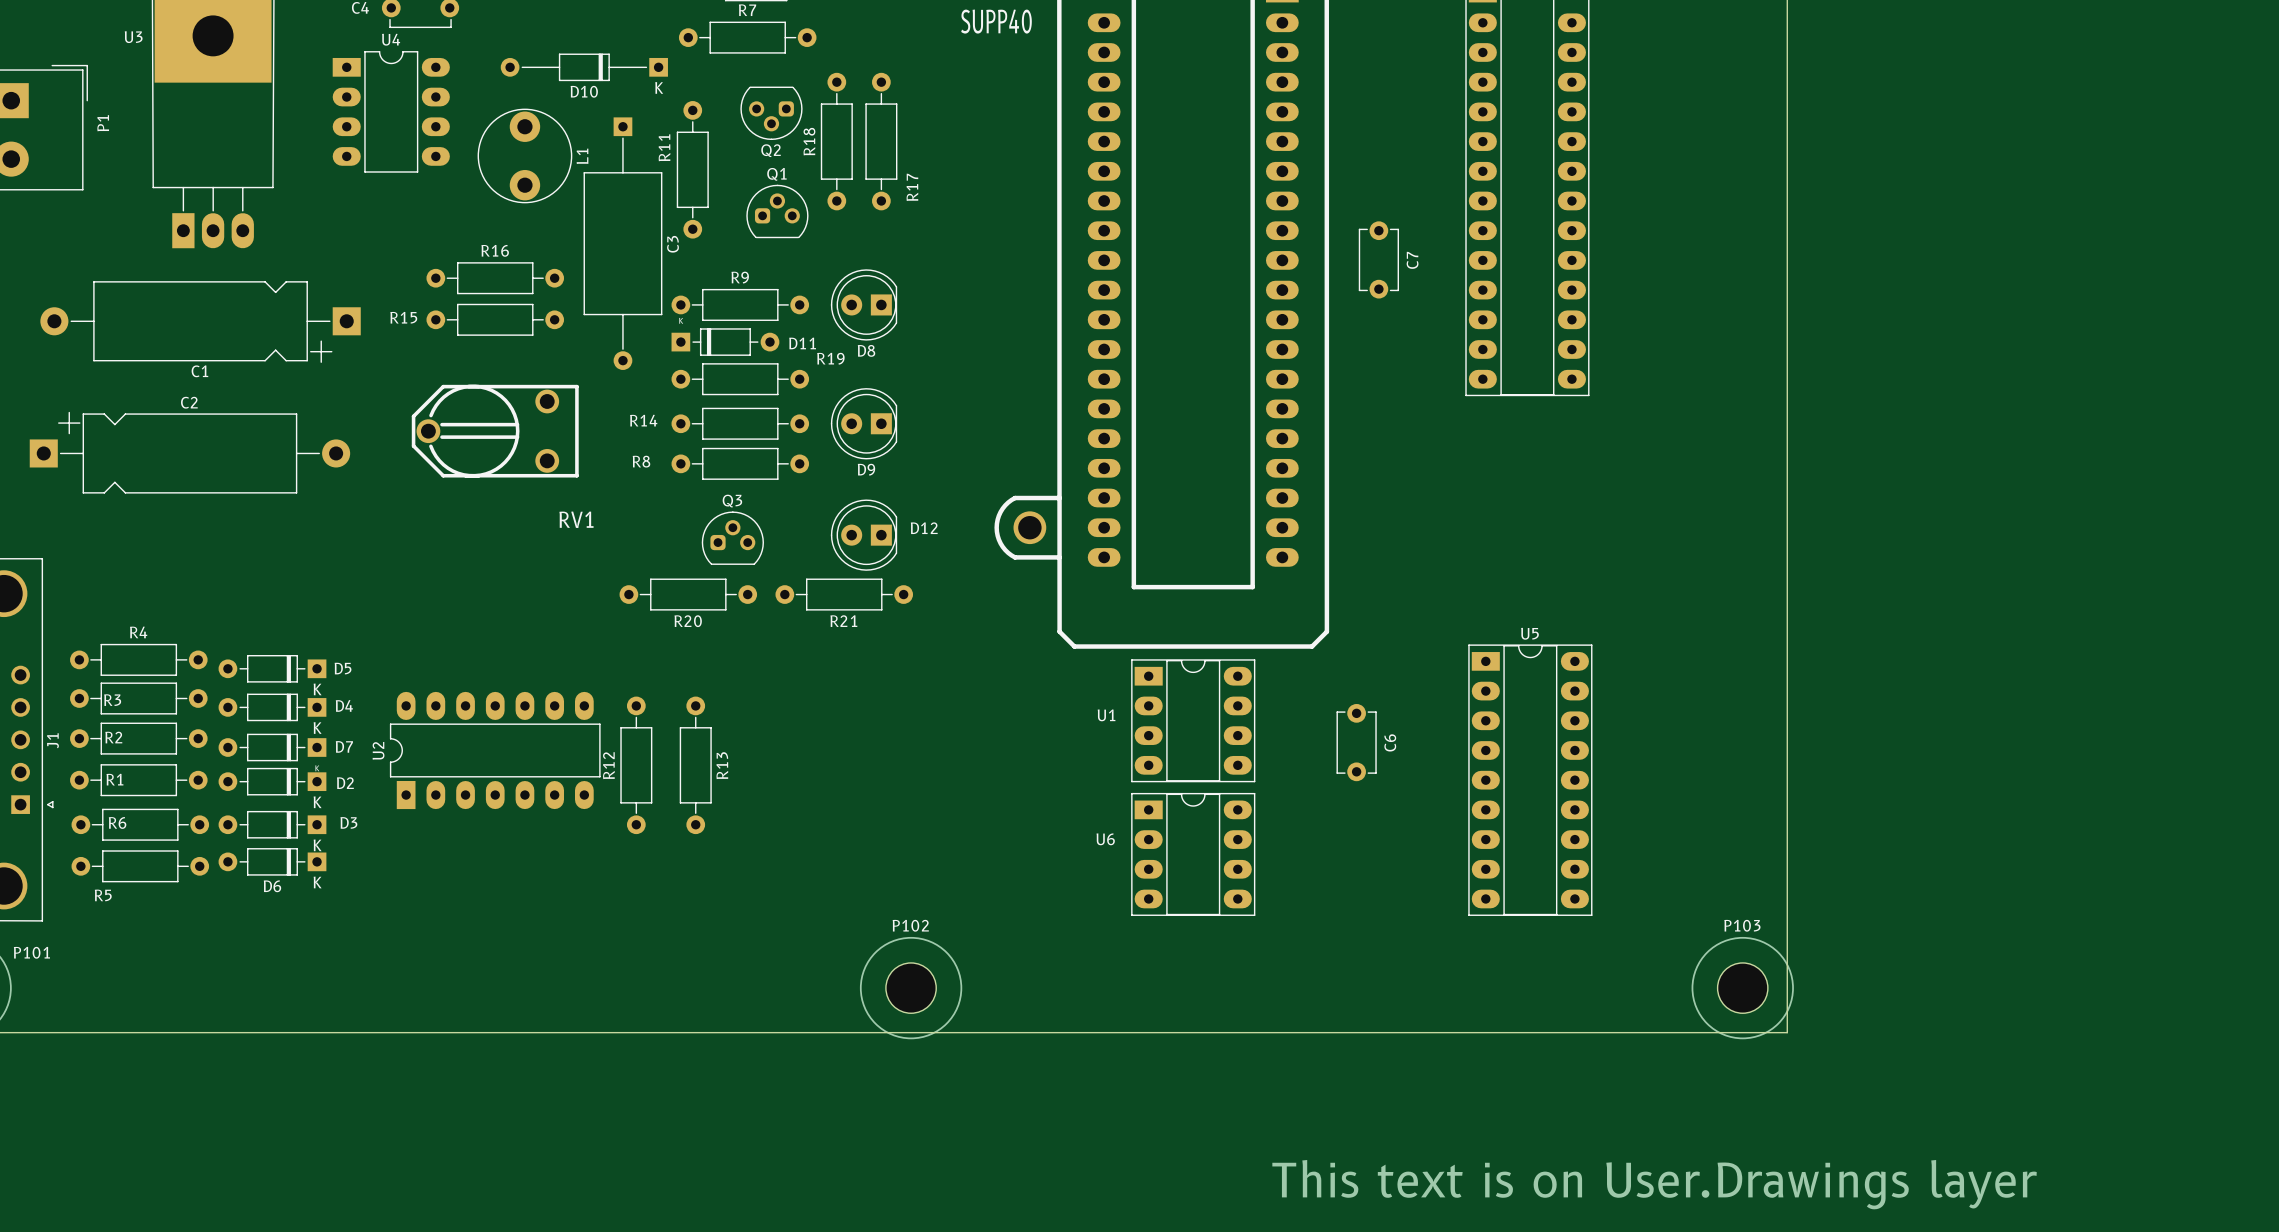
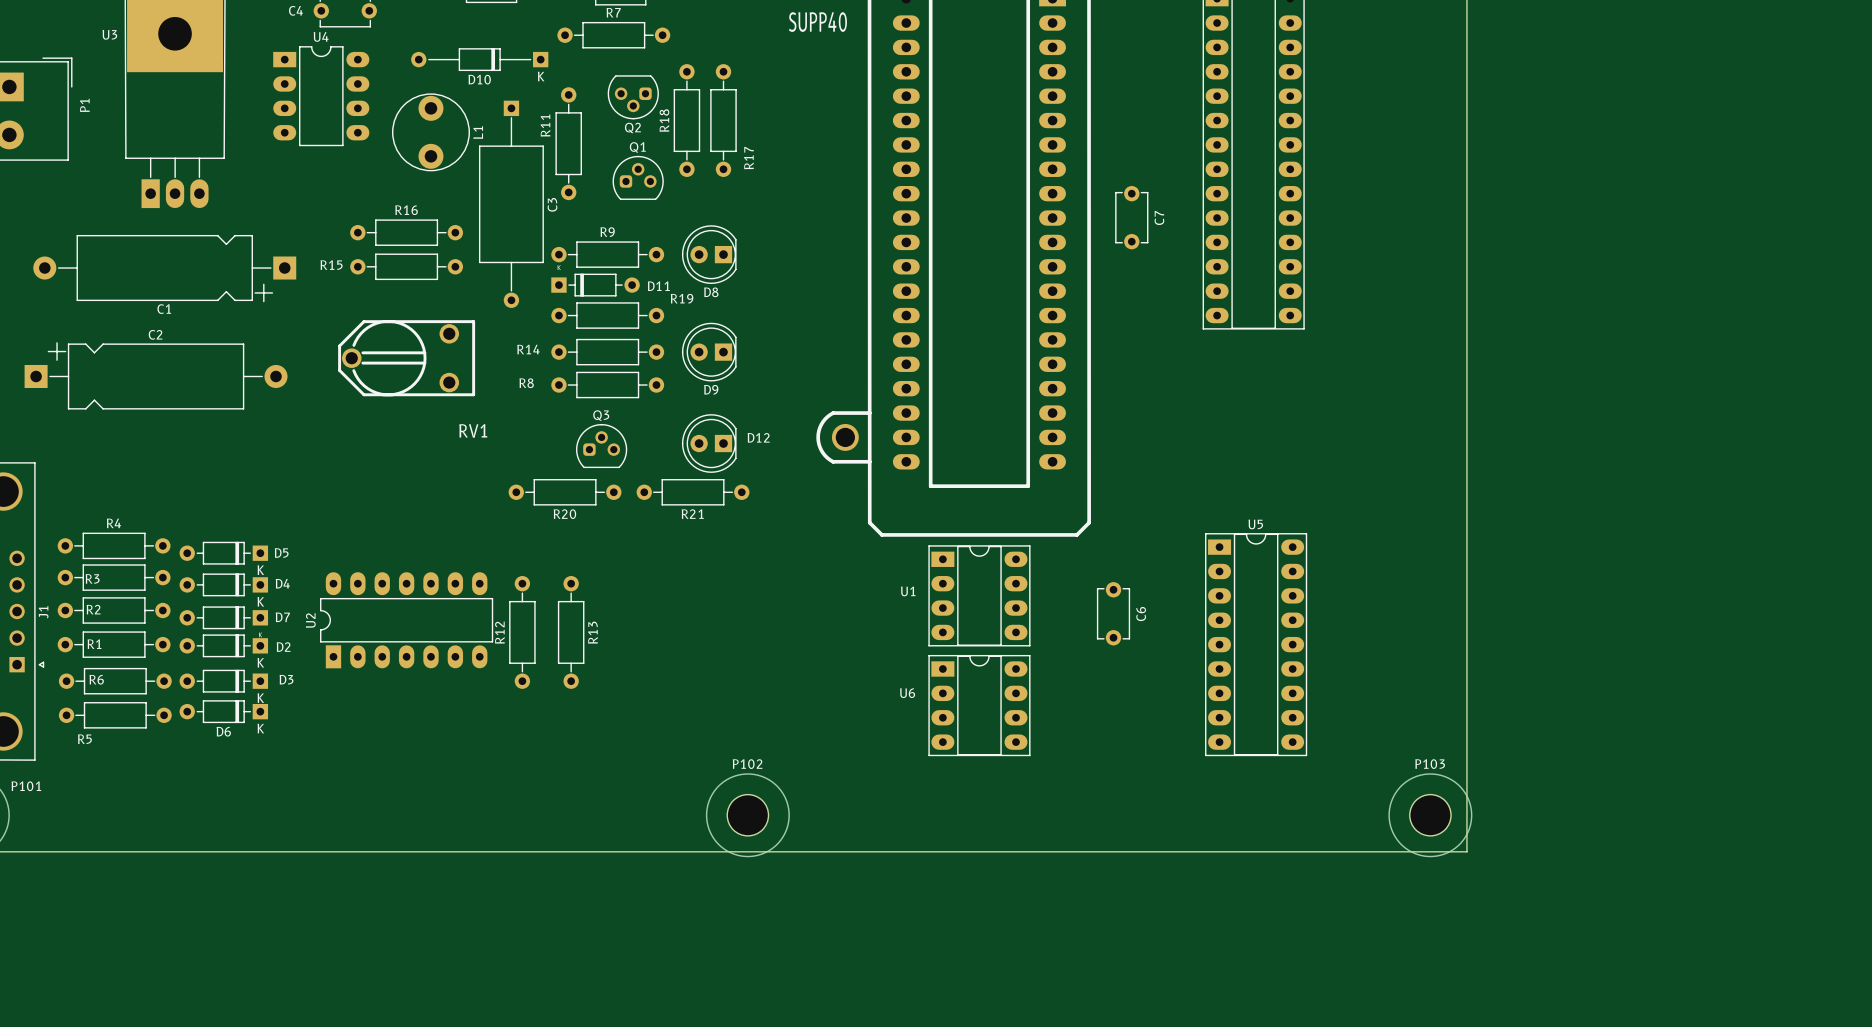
text: This text is on User.Drawings layer (1654, 1184) -> none

